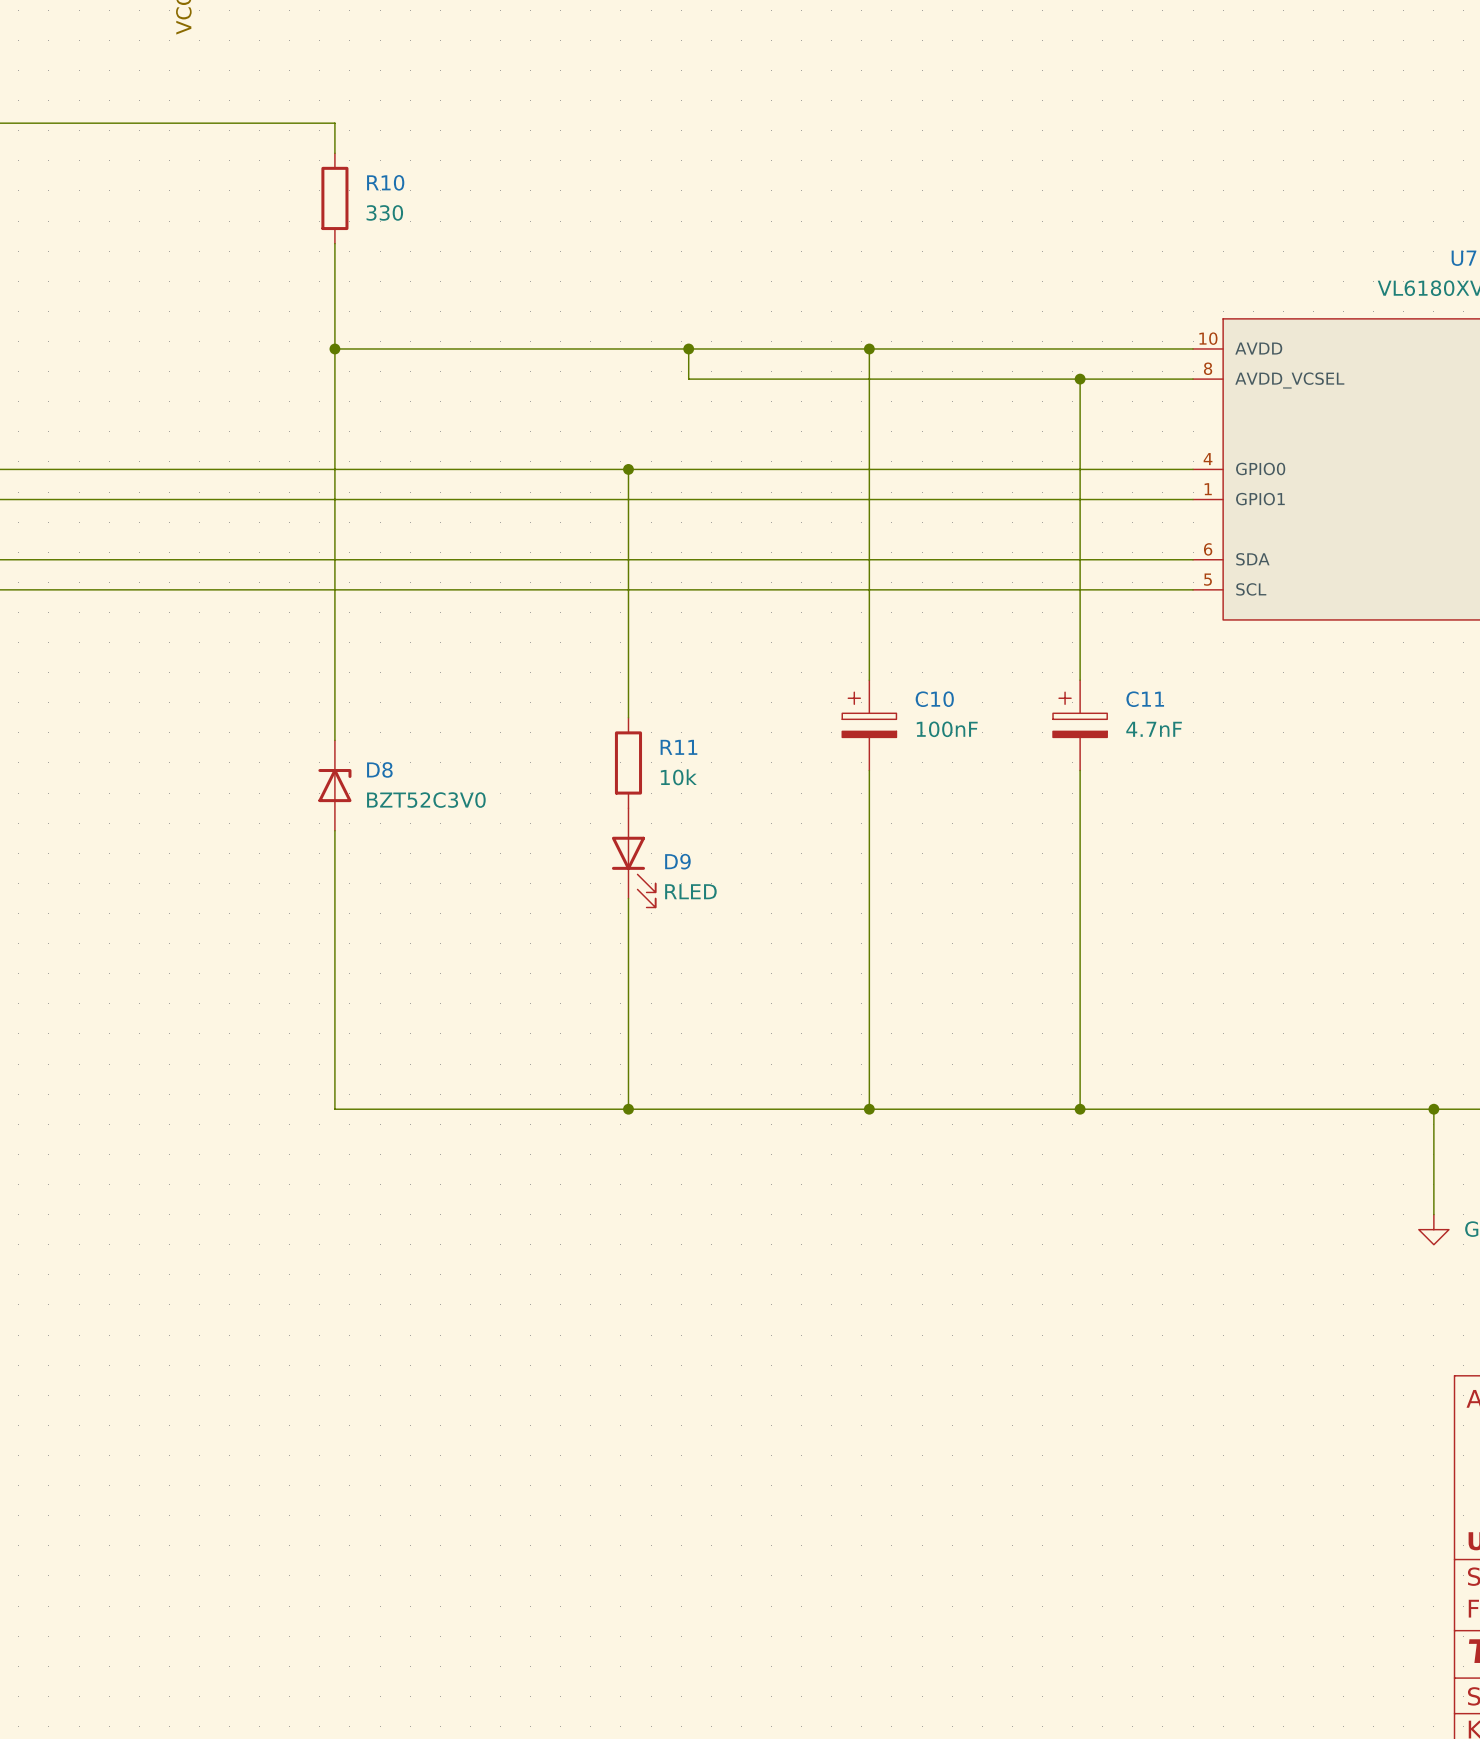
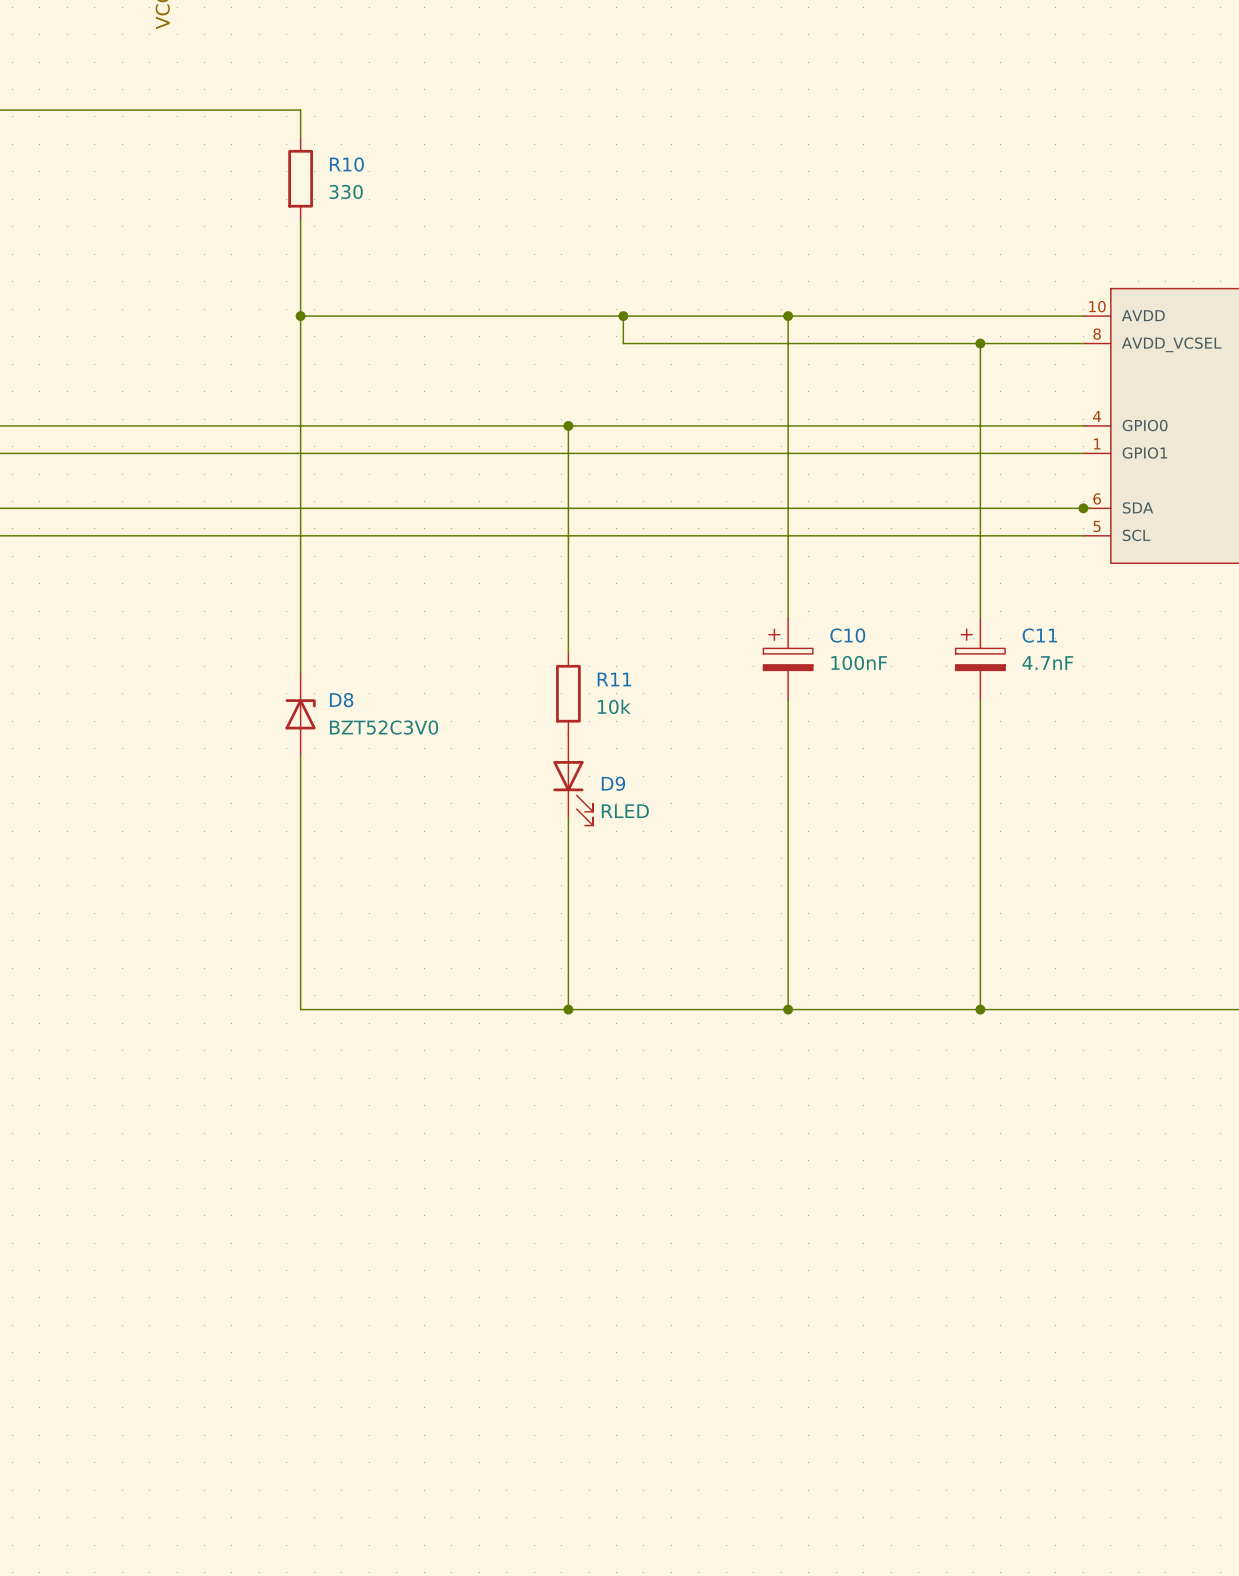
junction: none -> (1083, 508)

